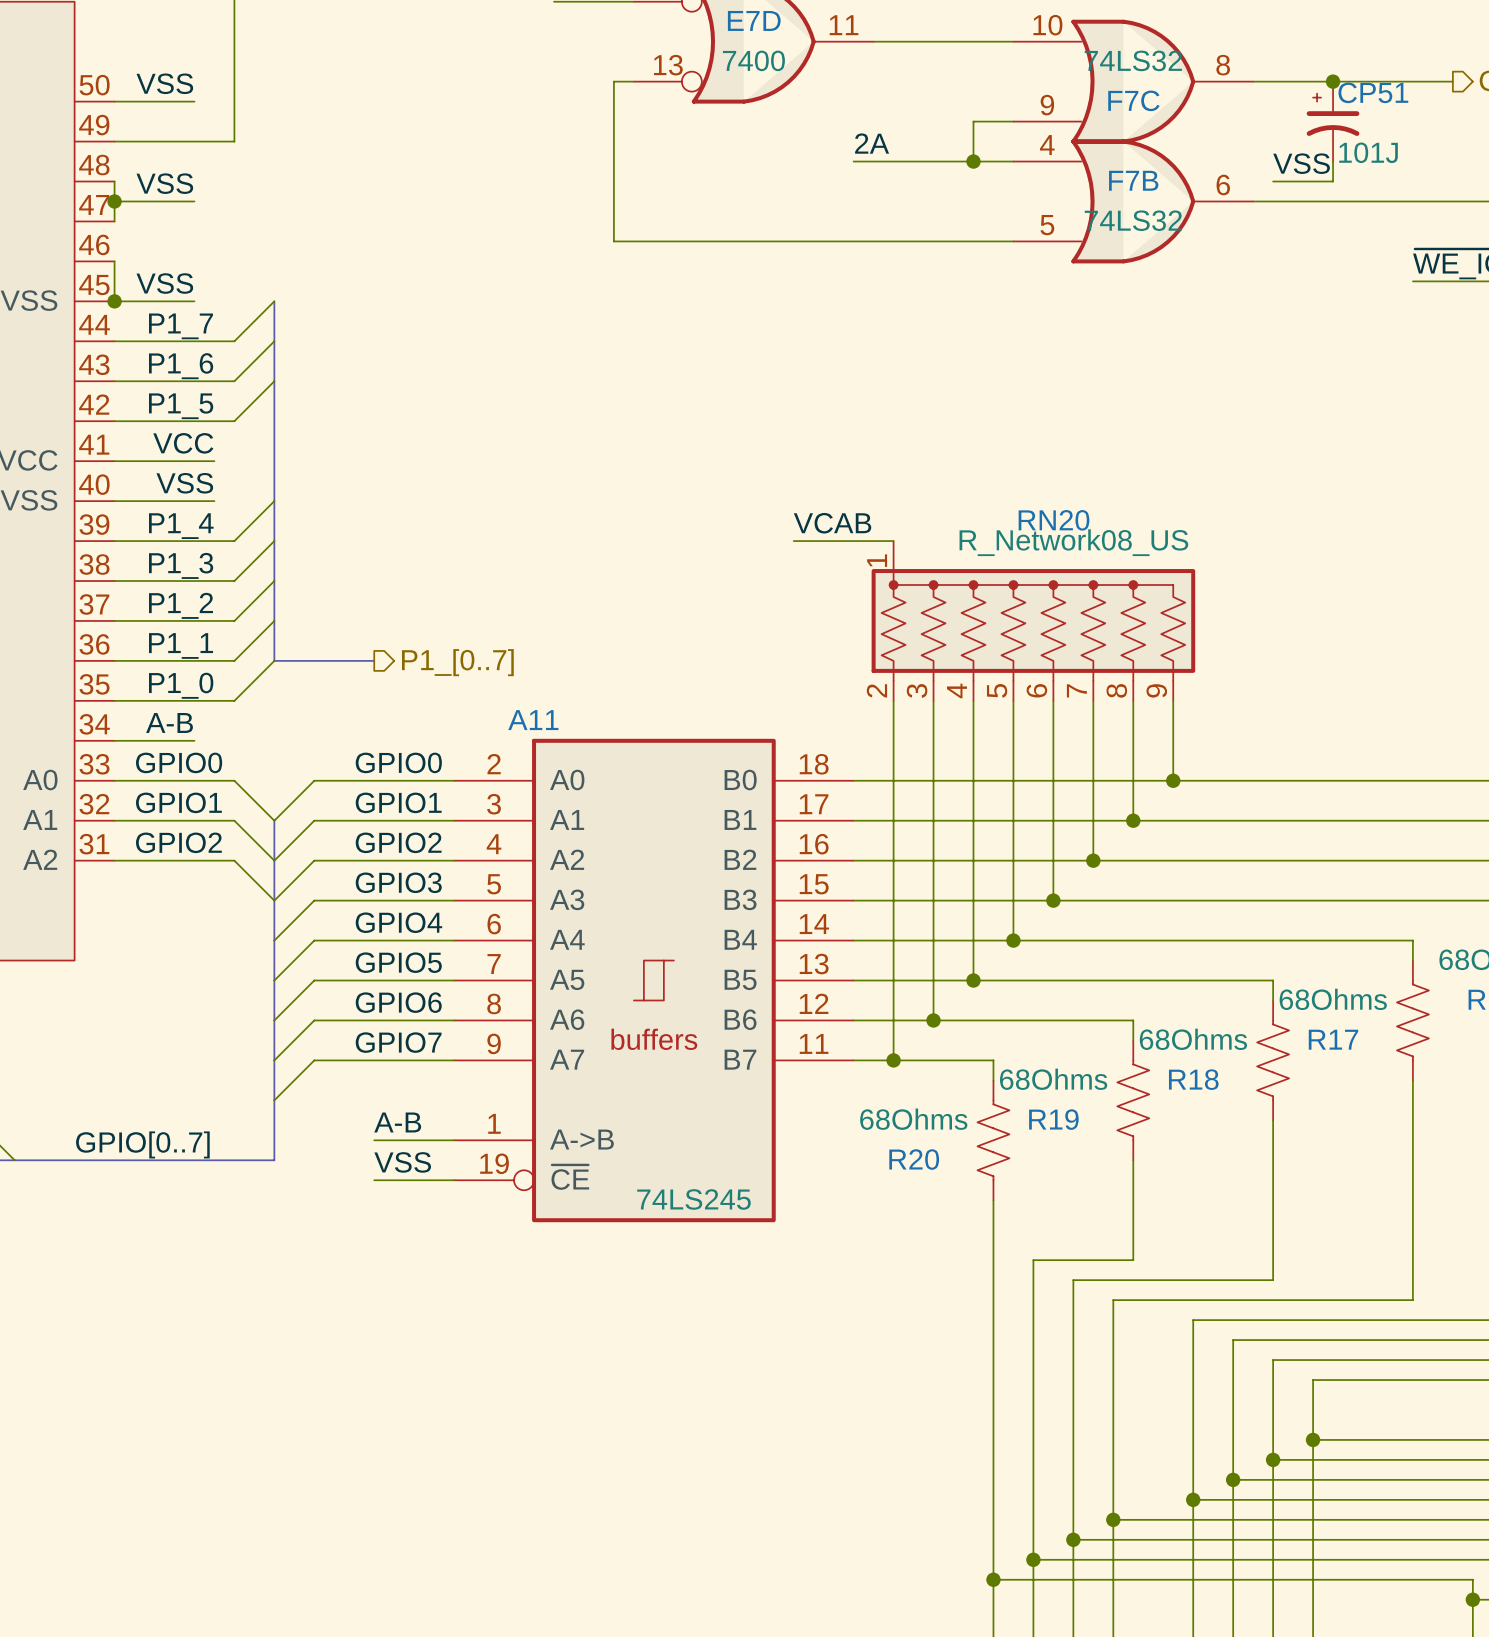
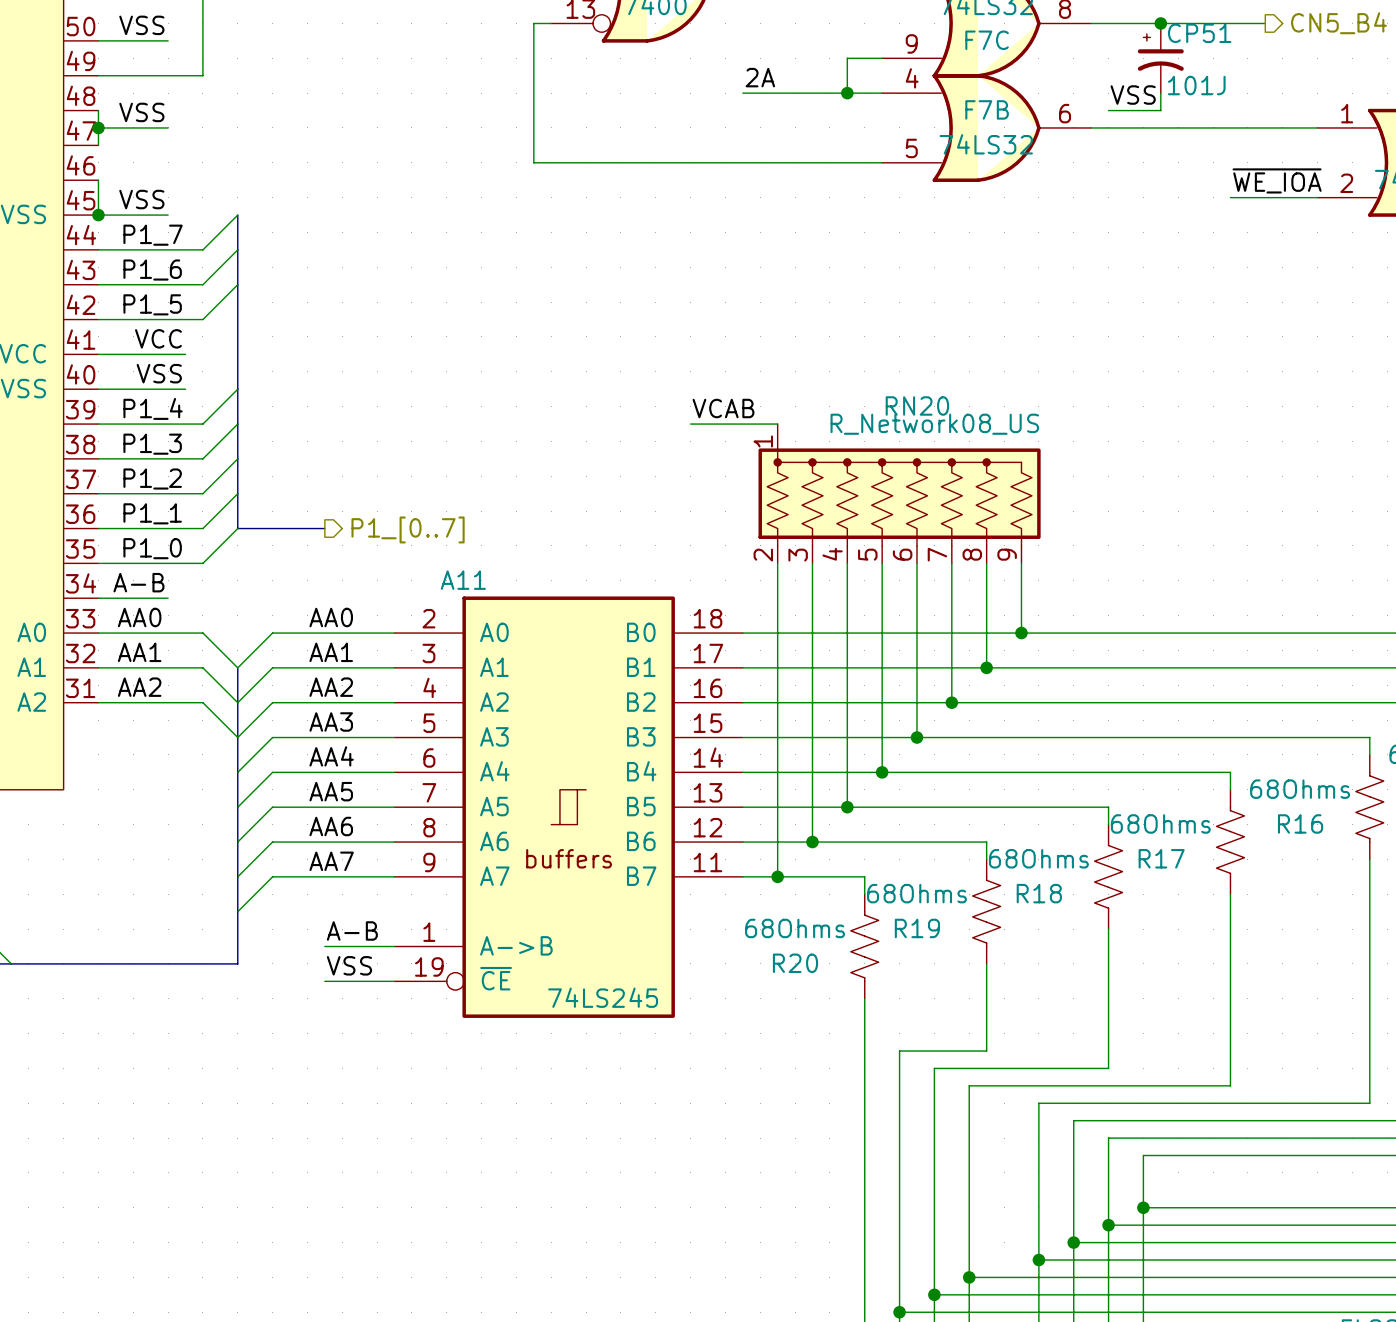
label: GPIO0 (179, 762) -> AA0 (139, 617)
label: GPIO0 (398, 762) -> AA0 (331, 617)
label: GPIO1 (178, 802) -> AA1 (139, 652)
label: GPIO1 (398, 802) -> AA1 (331, 652)
label: GPIO2 (178, 842) -> AA2 (139, 687)
label: GPIO2 (398, 842) -> AA2 (331, 687)
label: GPIO3 (398, 882) -> AA3 (331, 721)
label: GPIO4 (398, 922) -> AA4 (331, 756)
label: GPIO5 (398, 962) -> AA5 (331, 791)
label: GPIO6 (398, 1002) -> AA6 (331, 826)
label: GPIO7 (398, 1042) -> AA7 (331, 861)
label: GPIO[0..7] (142, 1144) -> none

